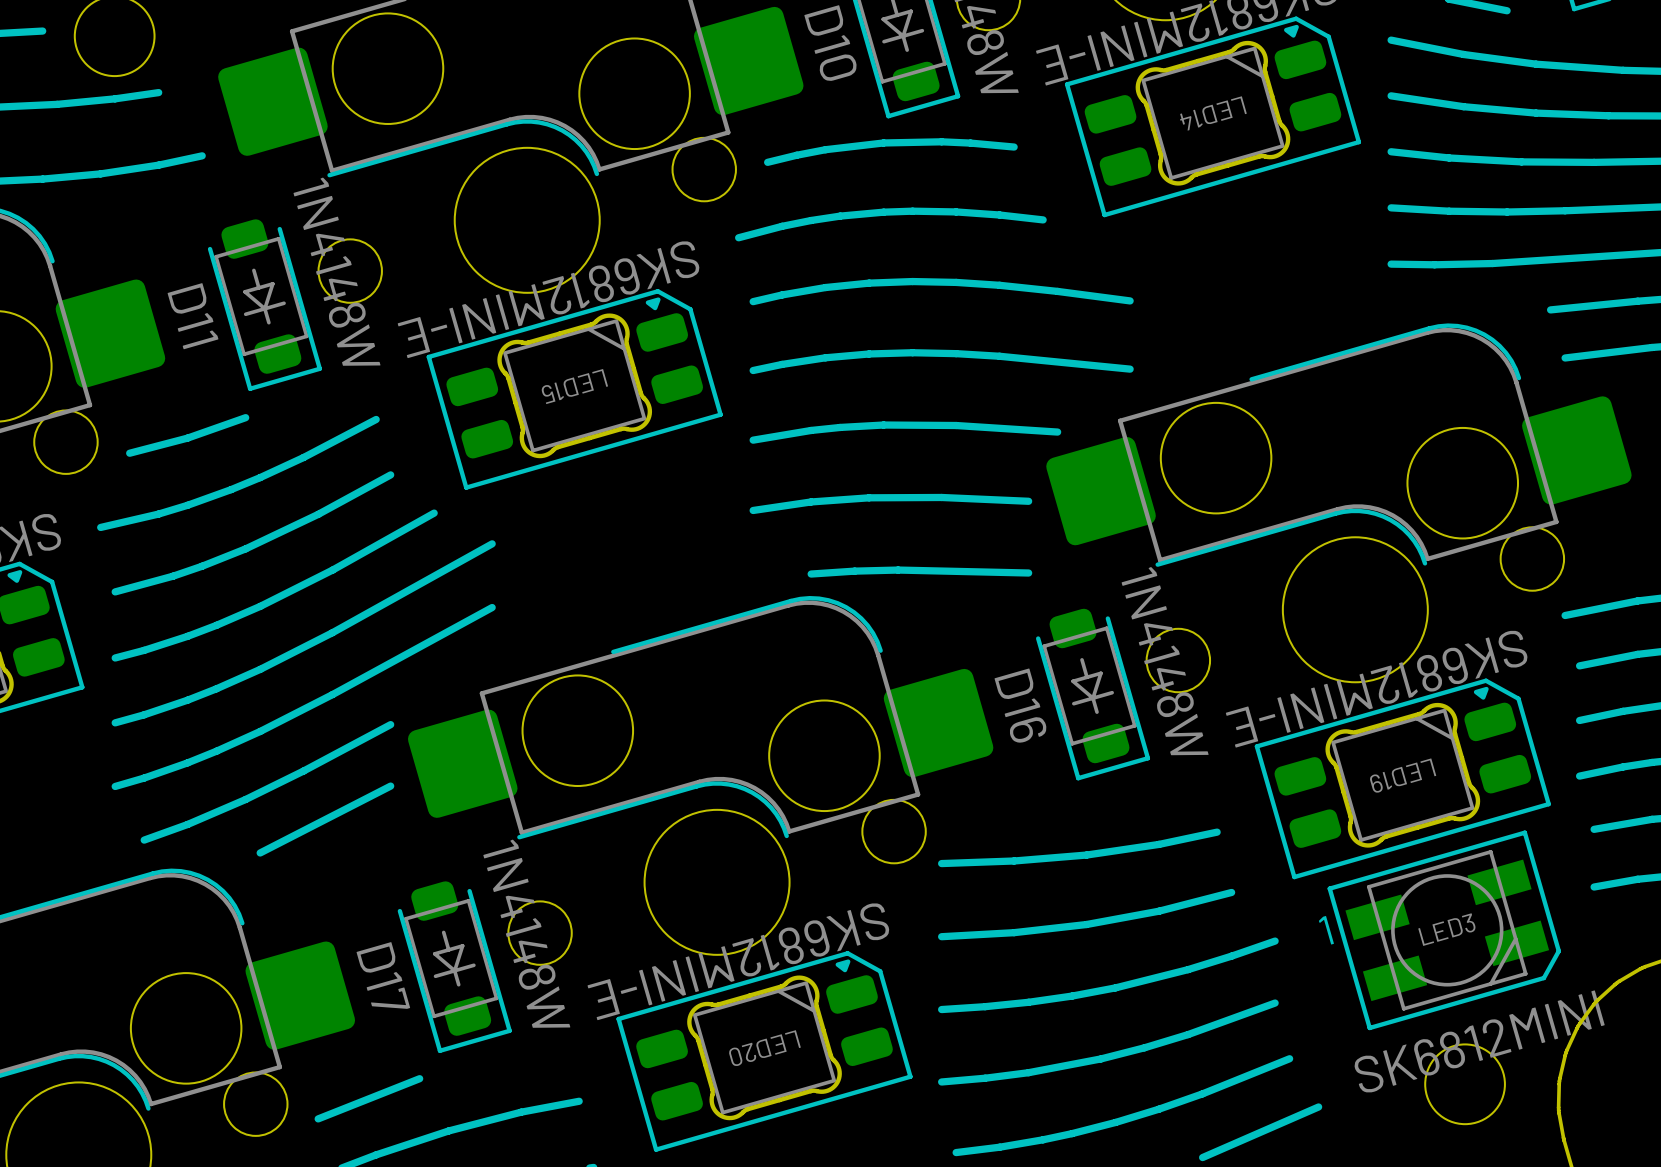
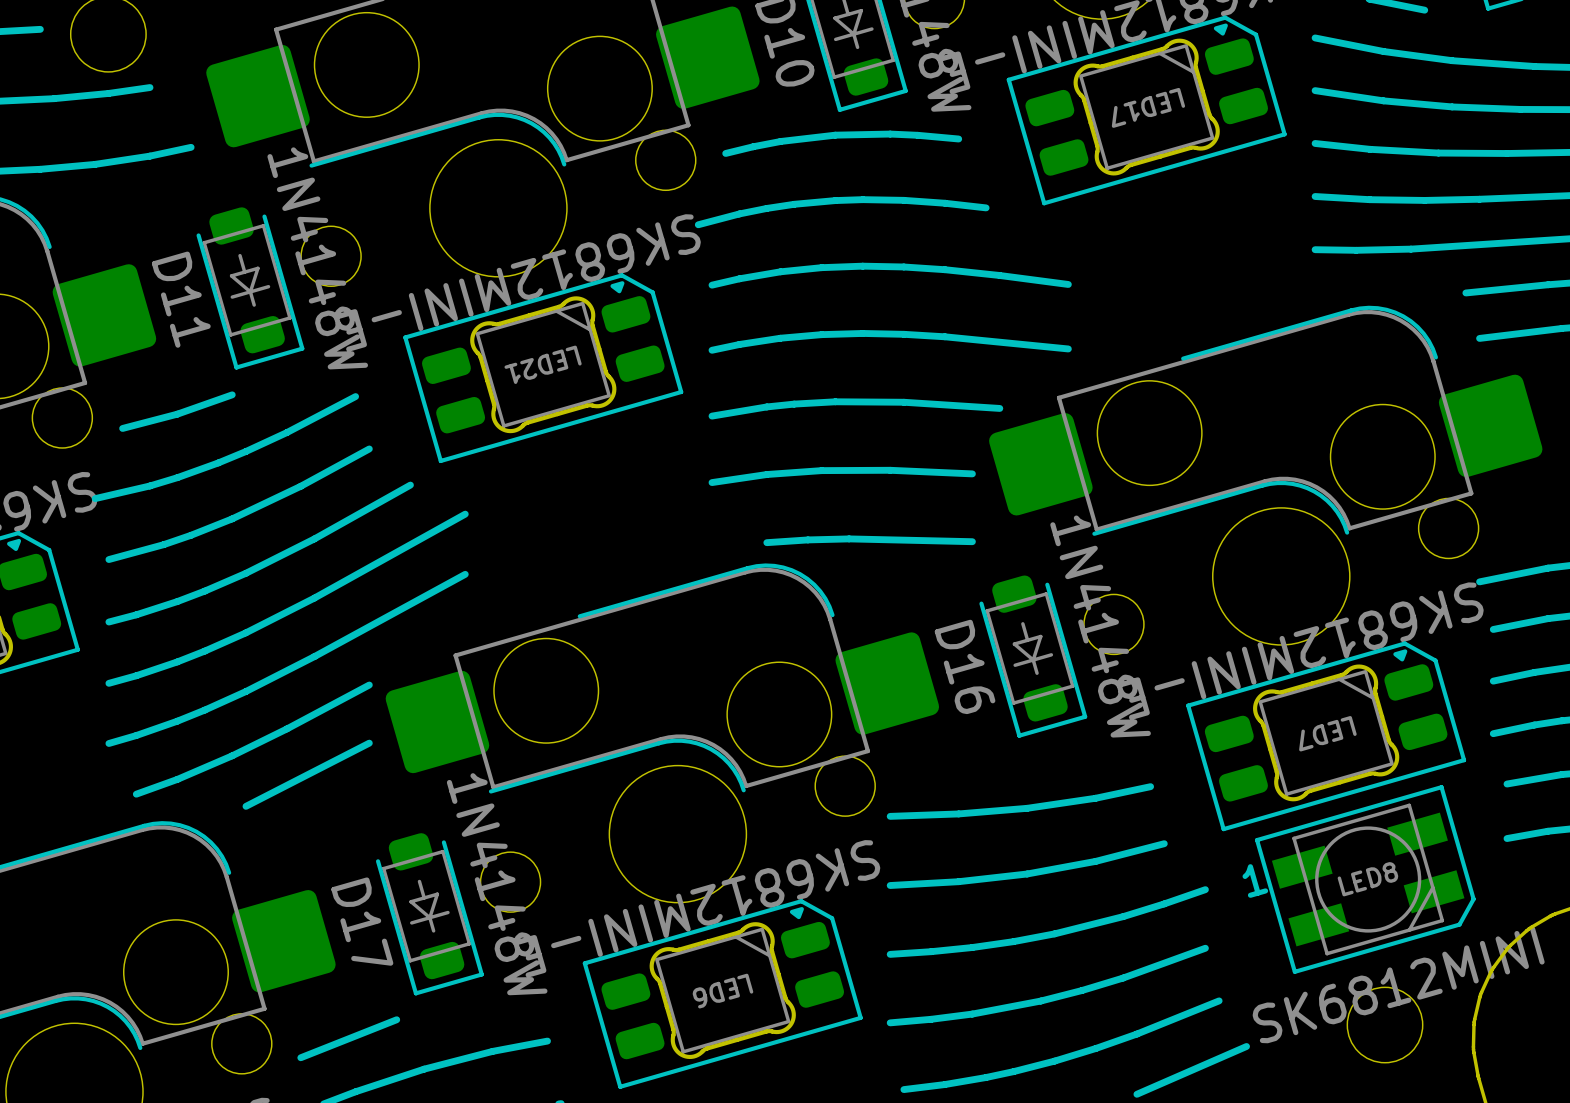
LED14 name: LED14 (1213, 113) -> LED17 (1148, 107)
LED15 name: LED15 (574, 386) -> LED21 (543, 364)
LED19 name: LED19 (1402, 775) -> LED7 (1327, 733)
LED3 name: LED3 (1446, 929) -> LED8 (1367, 879)
LED20 name: LED20 (764, 1048) -> LED6 (722, 991)

